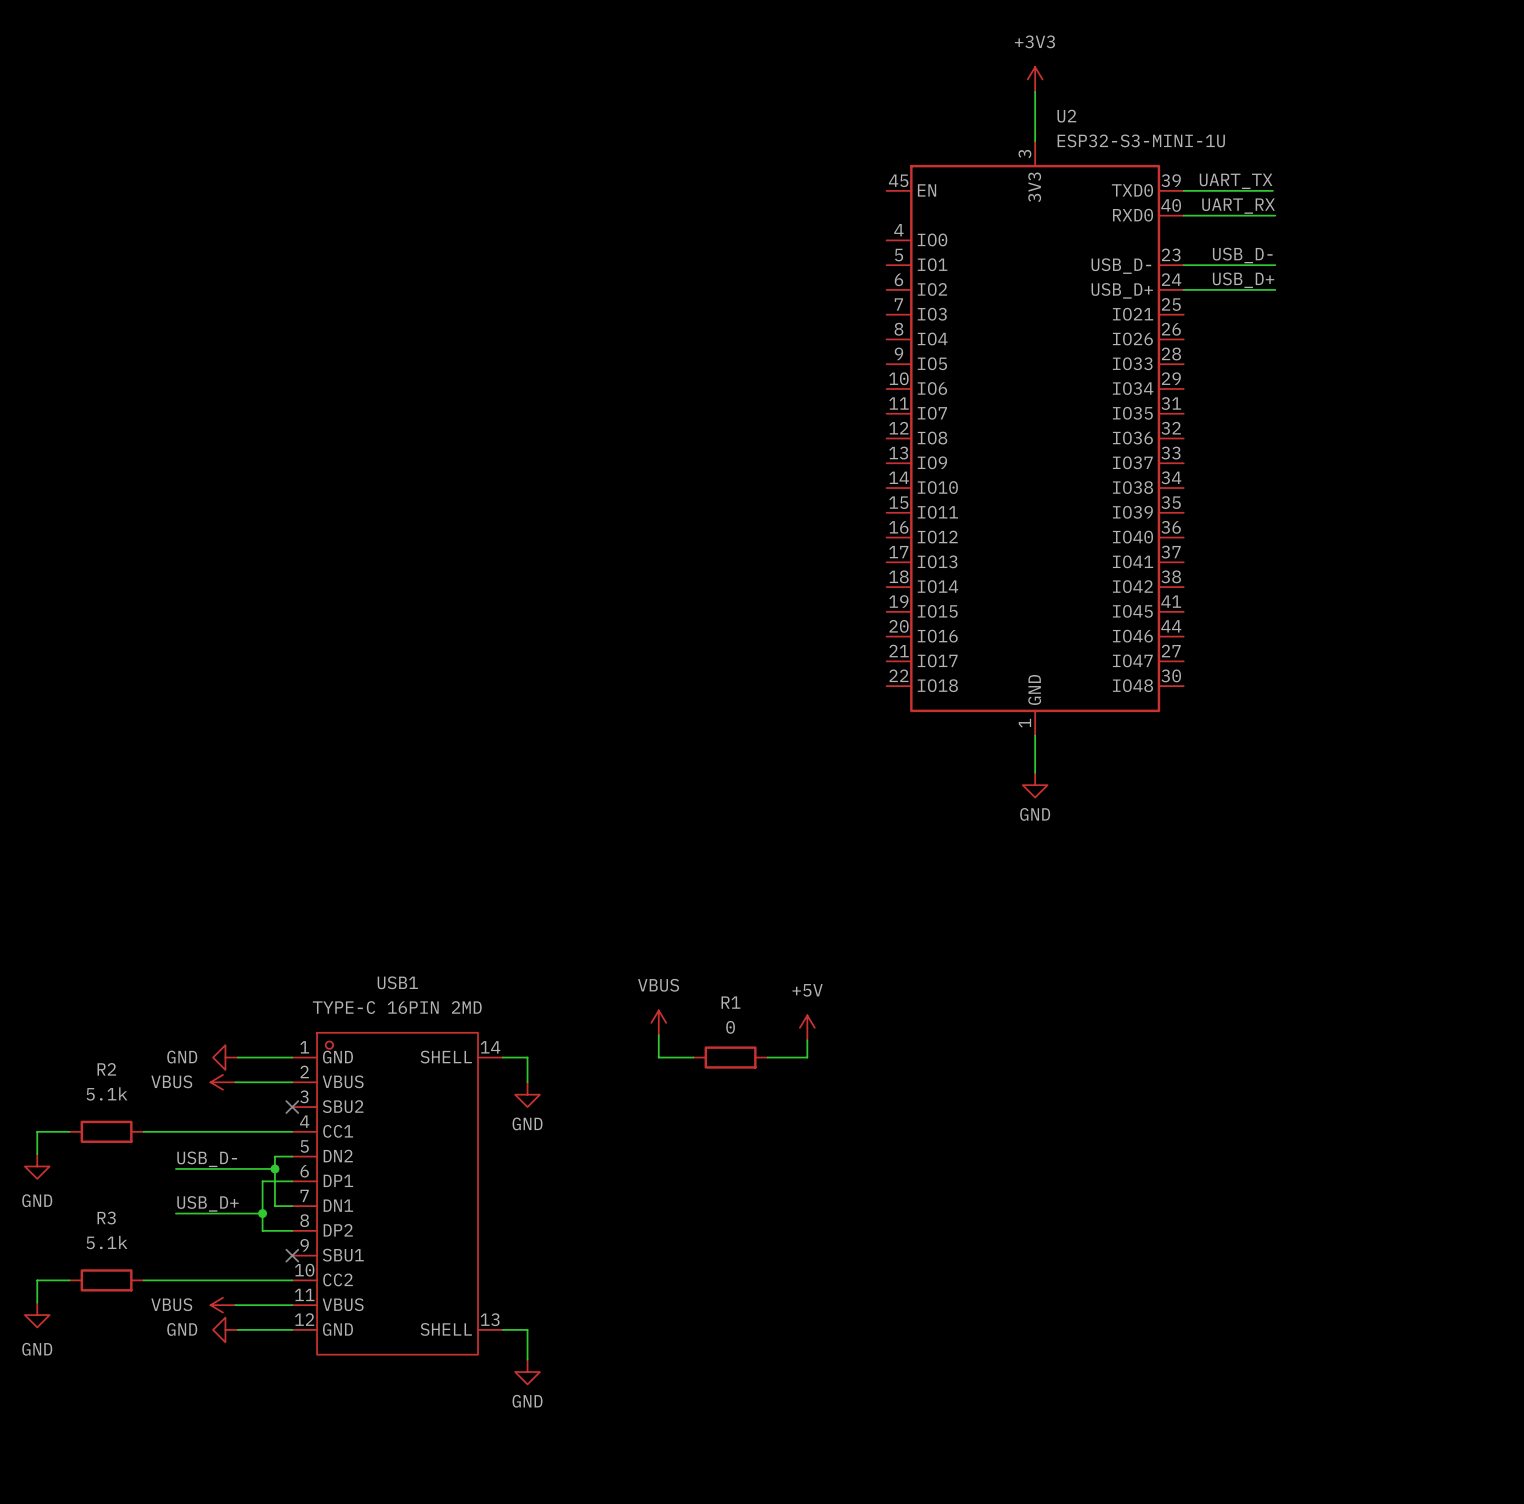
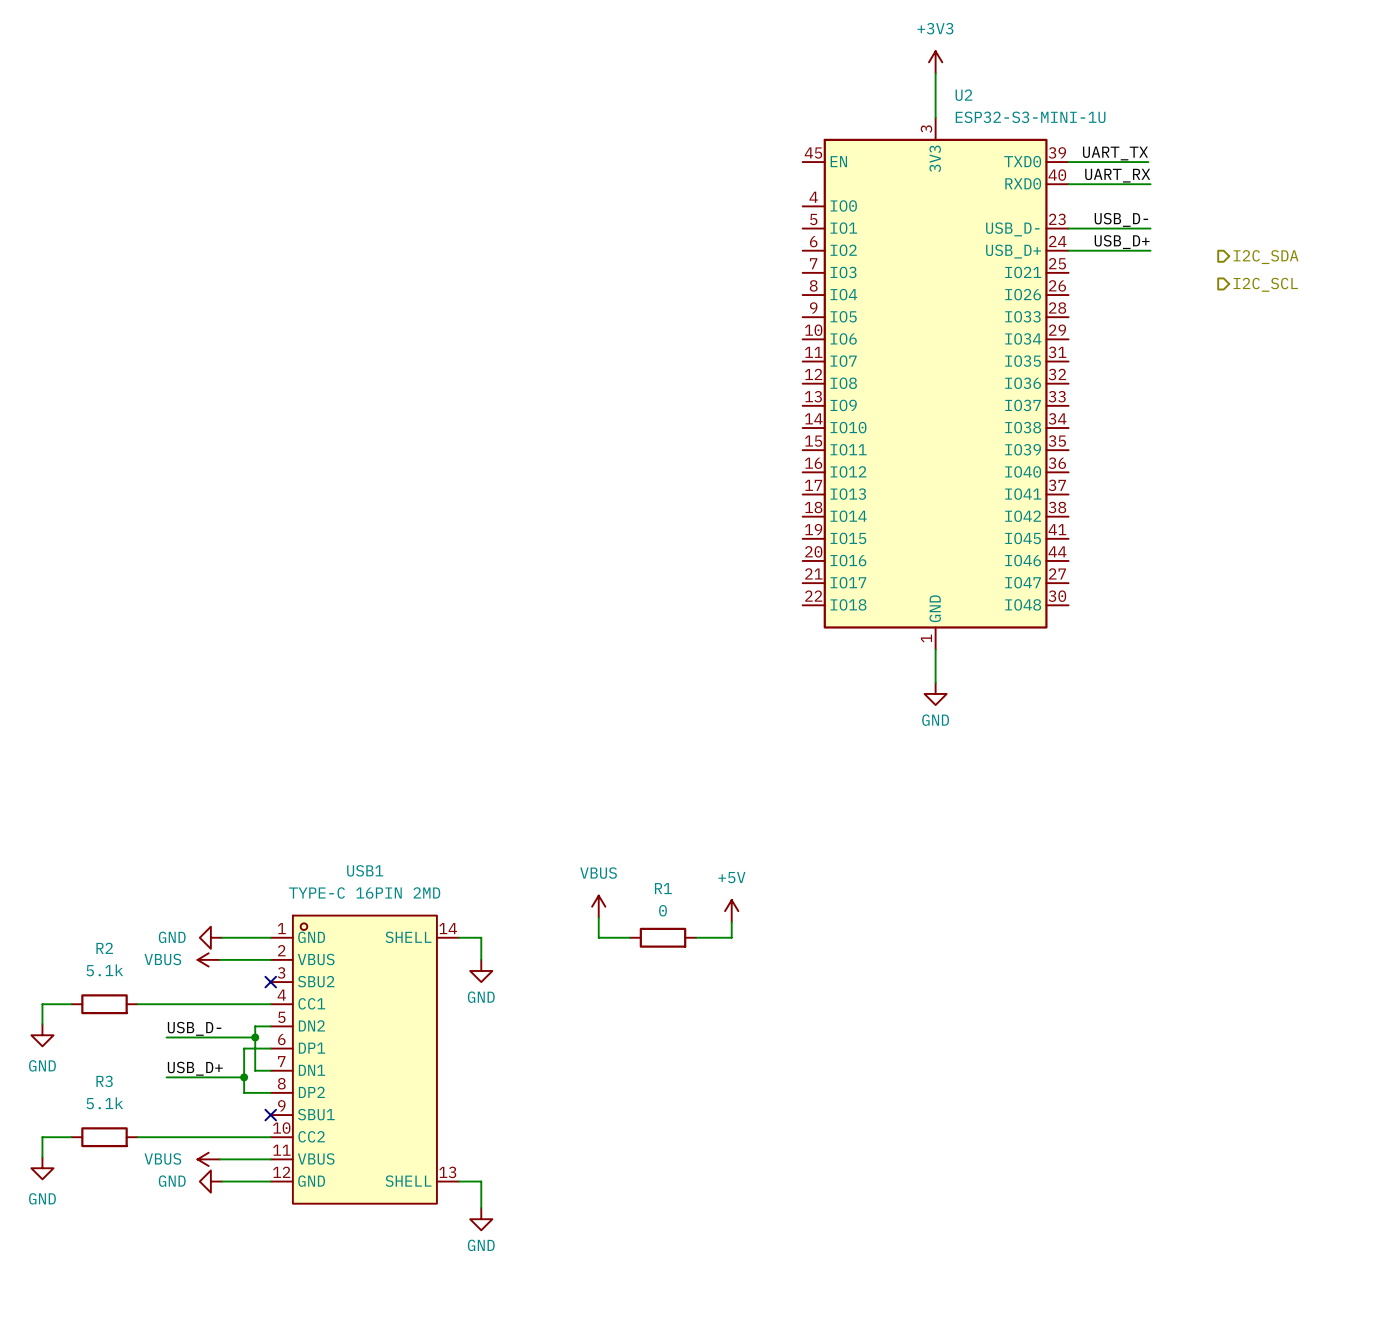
hierarchical label: none -> I2C_SDA (1266, 257)
hierarchical label: none -> I2C_SCL (1265, 284)

